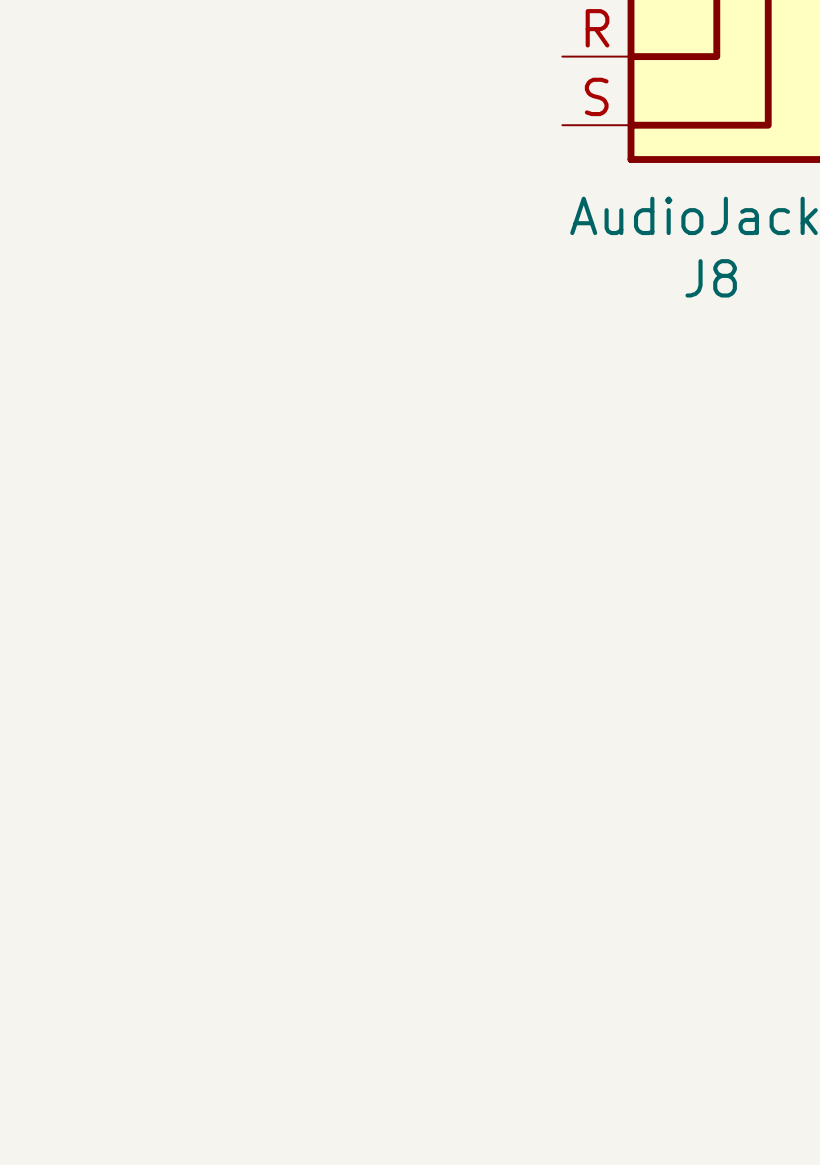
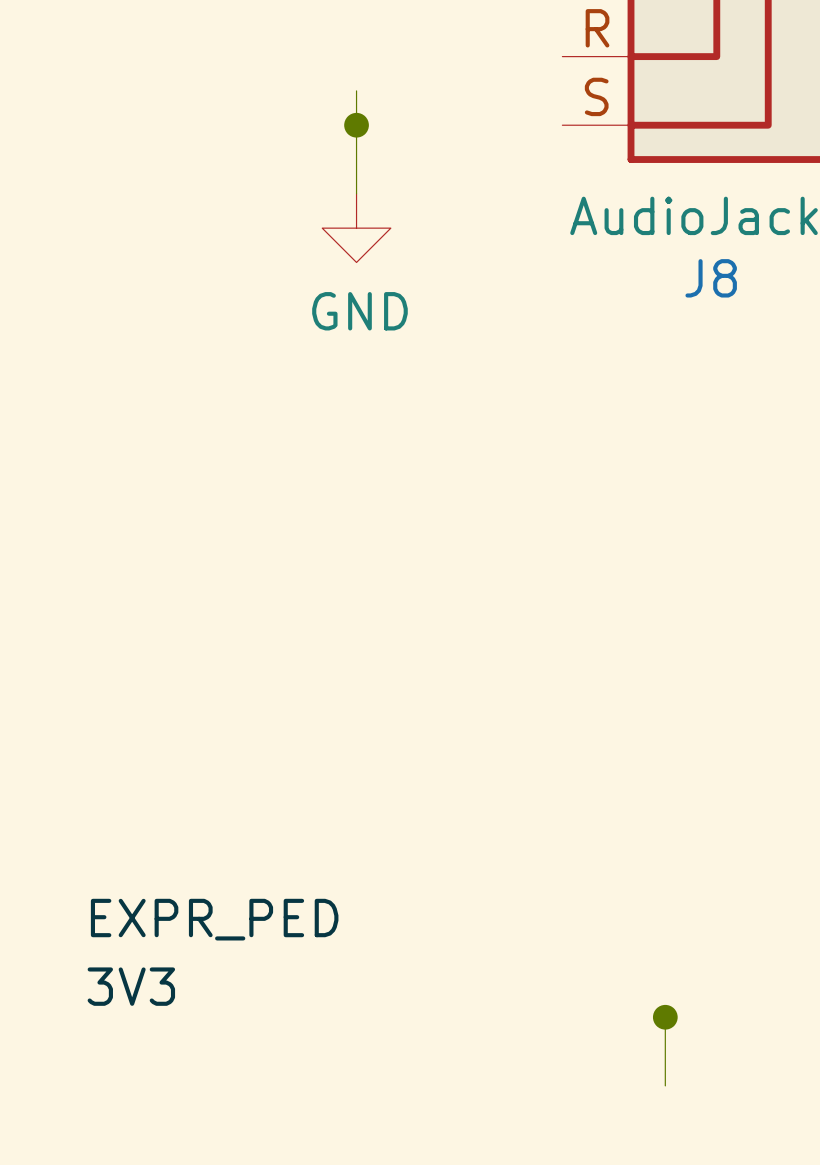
wire: none -> (356, 90) (356, 193)
junction: none -> (356, 125)
power symbol: none -> GND (356, 228)
label: none -> EXPR_PED (214, 919)
label: none -> 3V3 (131, 986)
wire: none -> (665, 1017) (665, 1085)
junction: none -> (665, 1017)

